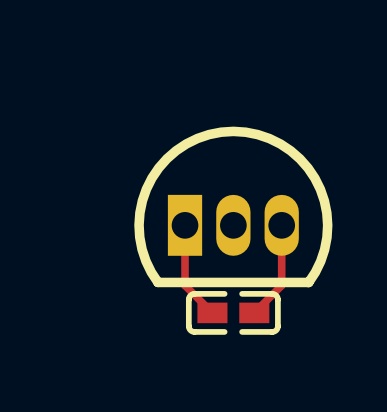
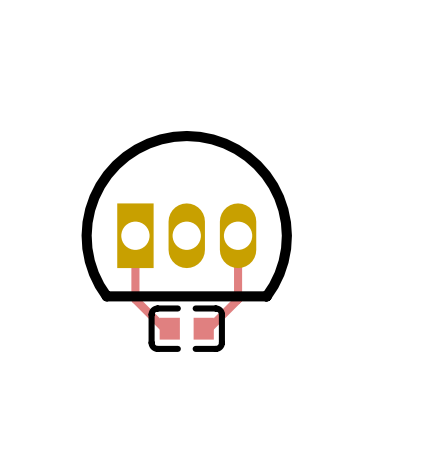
part footprint: [185, 291, 281, 335] -> [148, 305, 225, 352]

